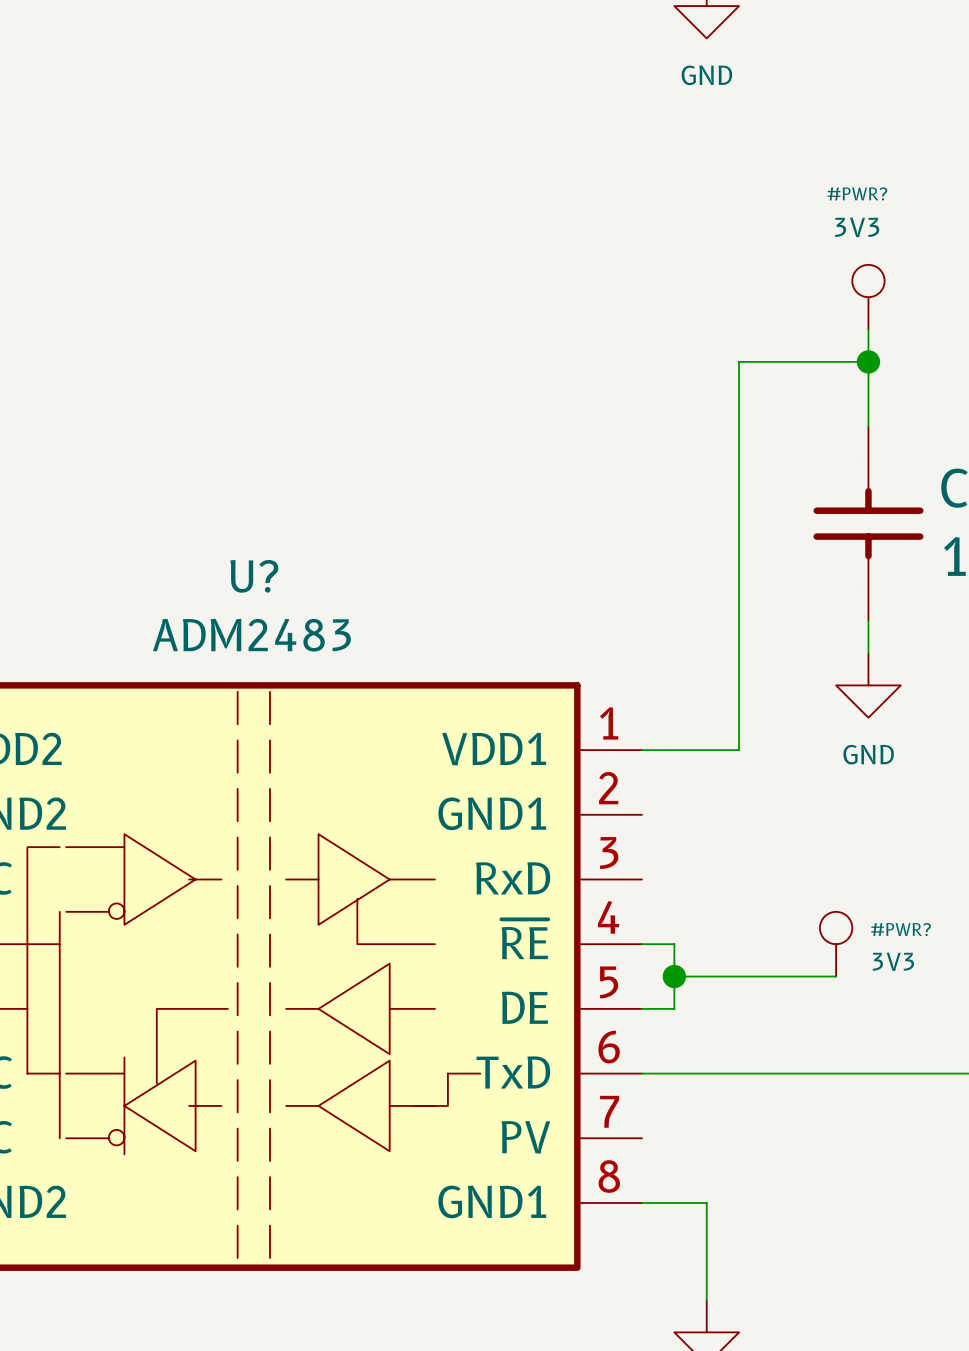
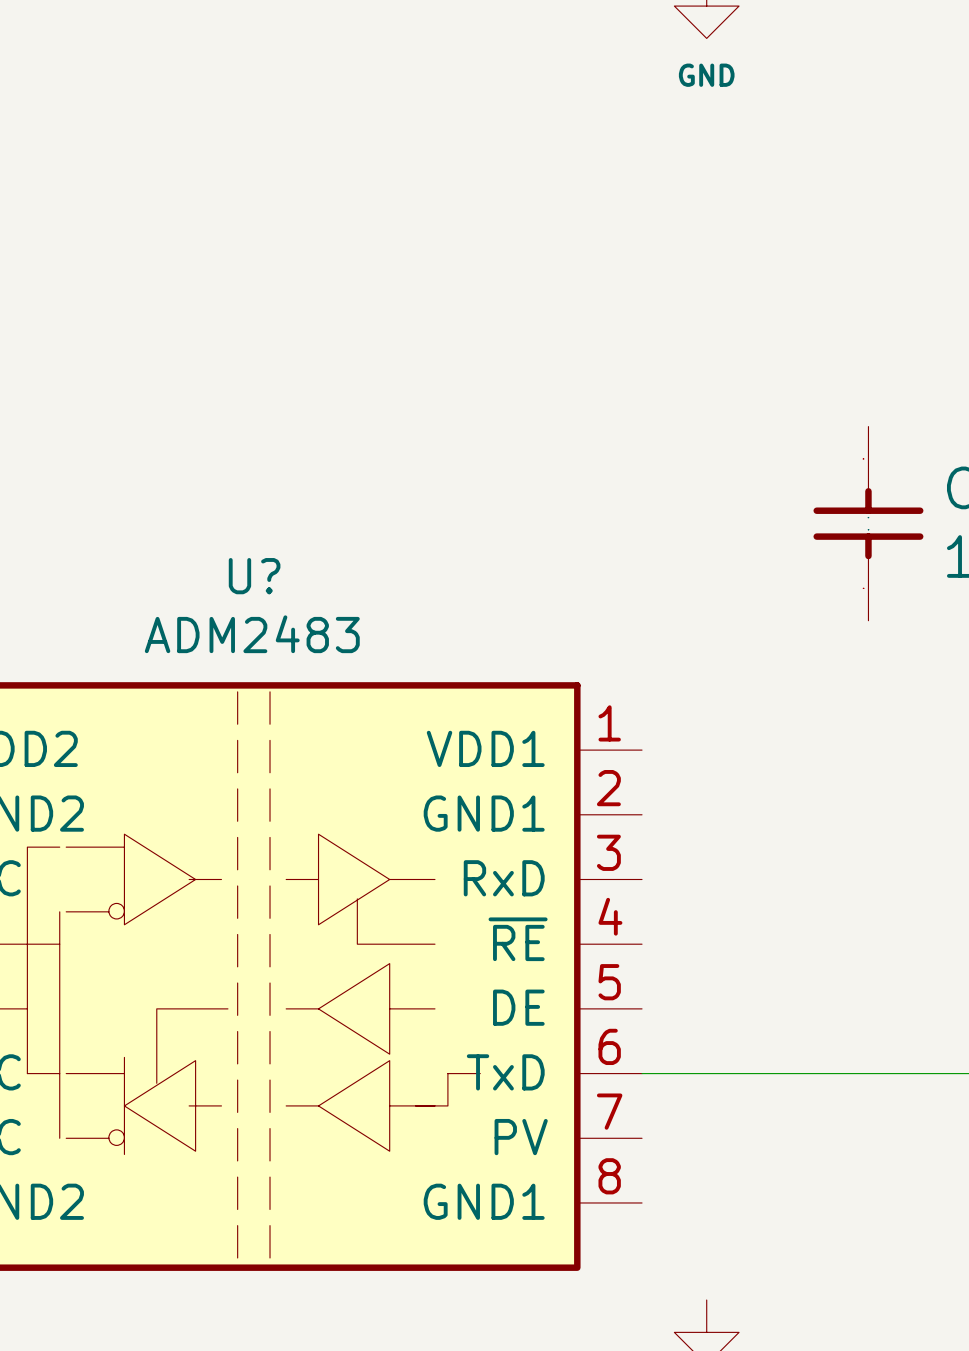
#PWR?: 3V3 (868, 297) -> none
wire: (868, 329) (868, 426) -> none
wire: (868, 361) (739, 361) (739, 750) (642, 750) -> none
junction: (868, 361) -> none
wire: (868, 620) (868, 653) -> none
power symbol: GND (868, 685) -> none
wire: (642, 944) (674, 944) (674, 1008) (642, 1008) -> none
#PWR?: 3V3 (836, 944) -> none
wire: (674, 976) (836, 976) -> none
junction: (674, 976) -> none
wire: (642, 1202) (706, 1202) (706, 1300) -> none

